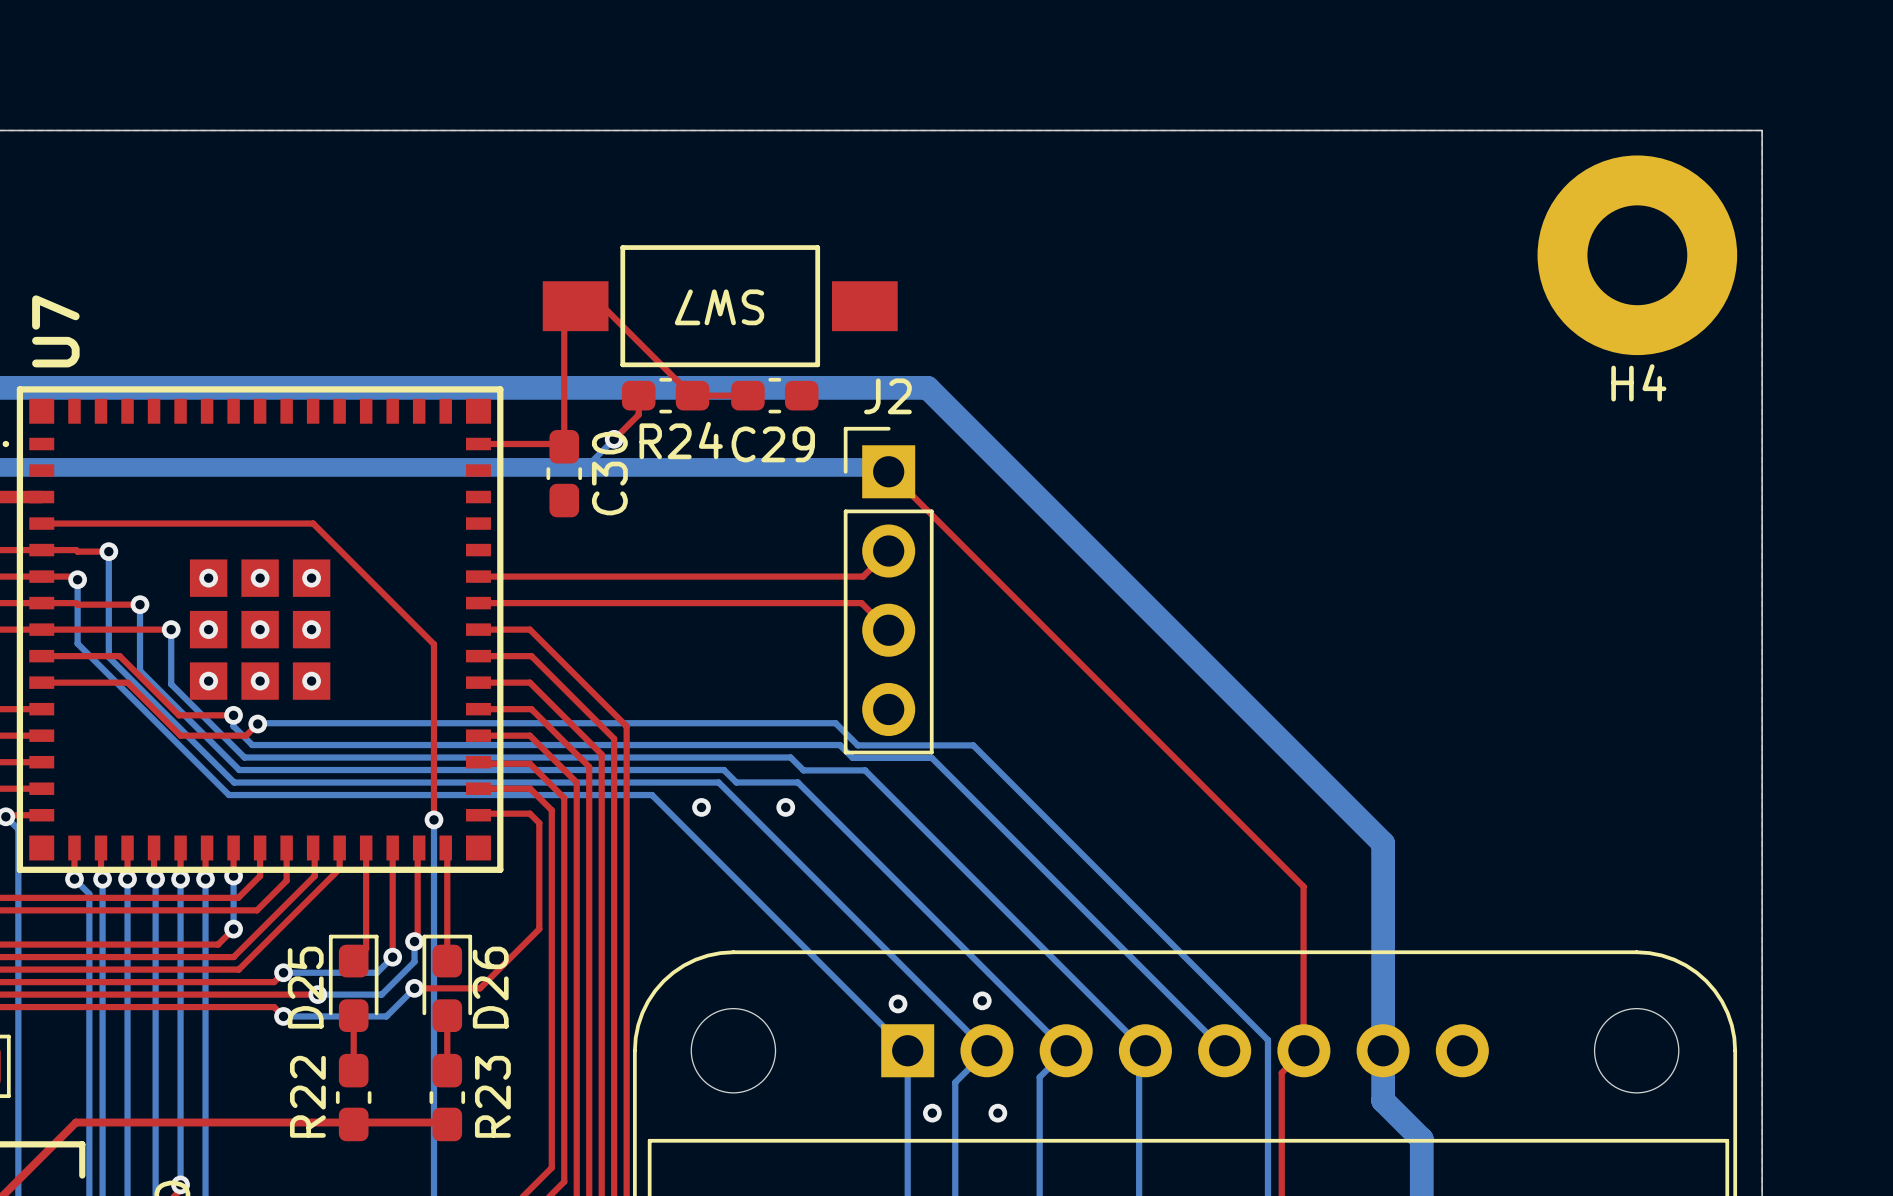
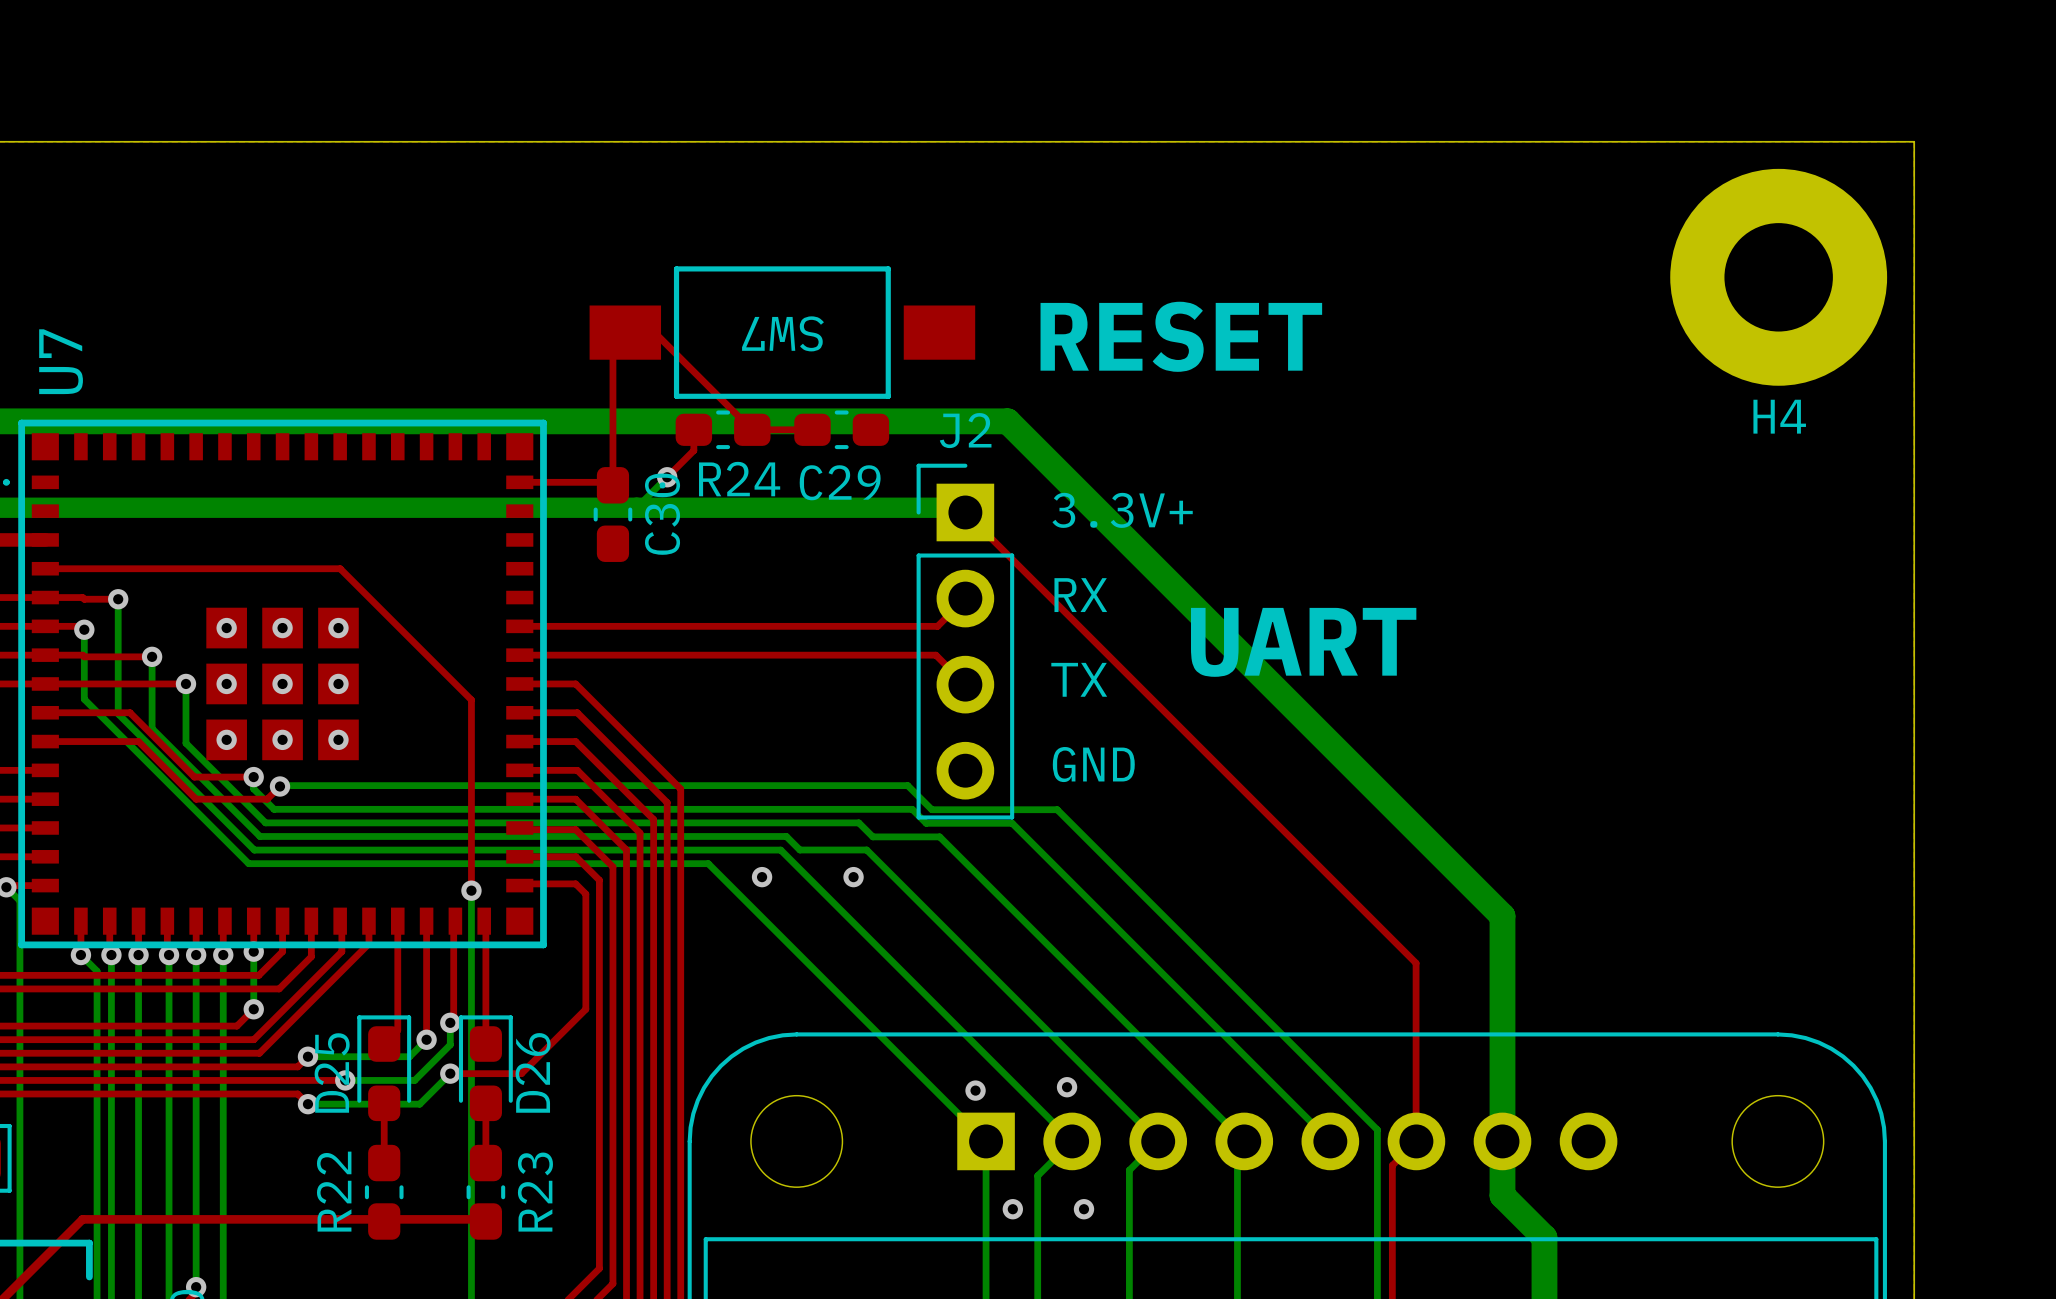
text: none -> RESET (1181, 336)
text: none -> 3.3V+ (1122, 510)
text: none -> RX (1080, 595)
text: none -> UART (1303, 642)
text: none -> TX (1079, 679)
text: none -> GND (1093, 764)

